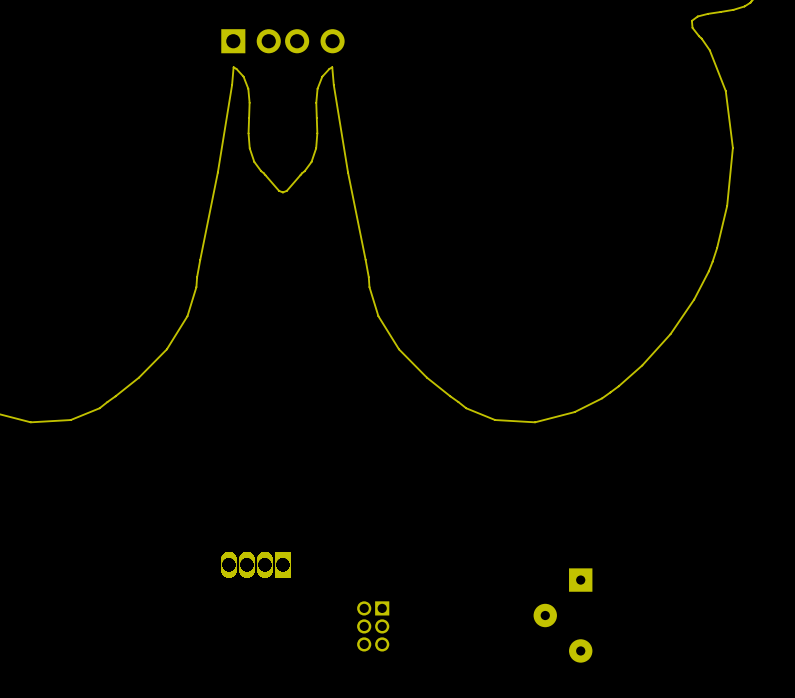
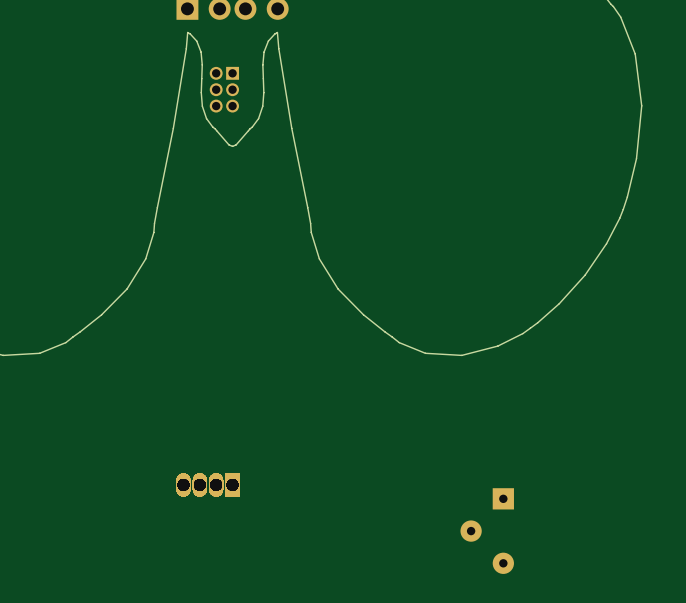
part: none -> (224, 89)
part: (373, 626) -> none

